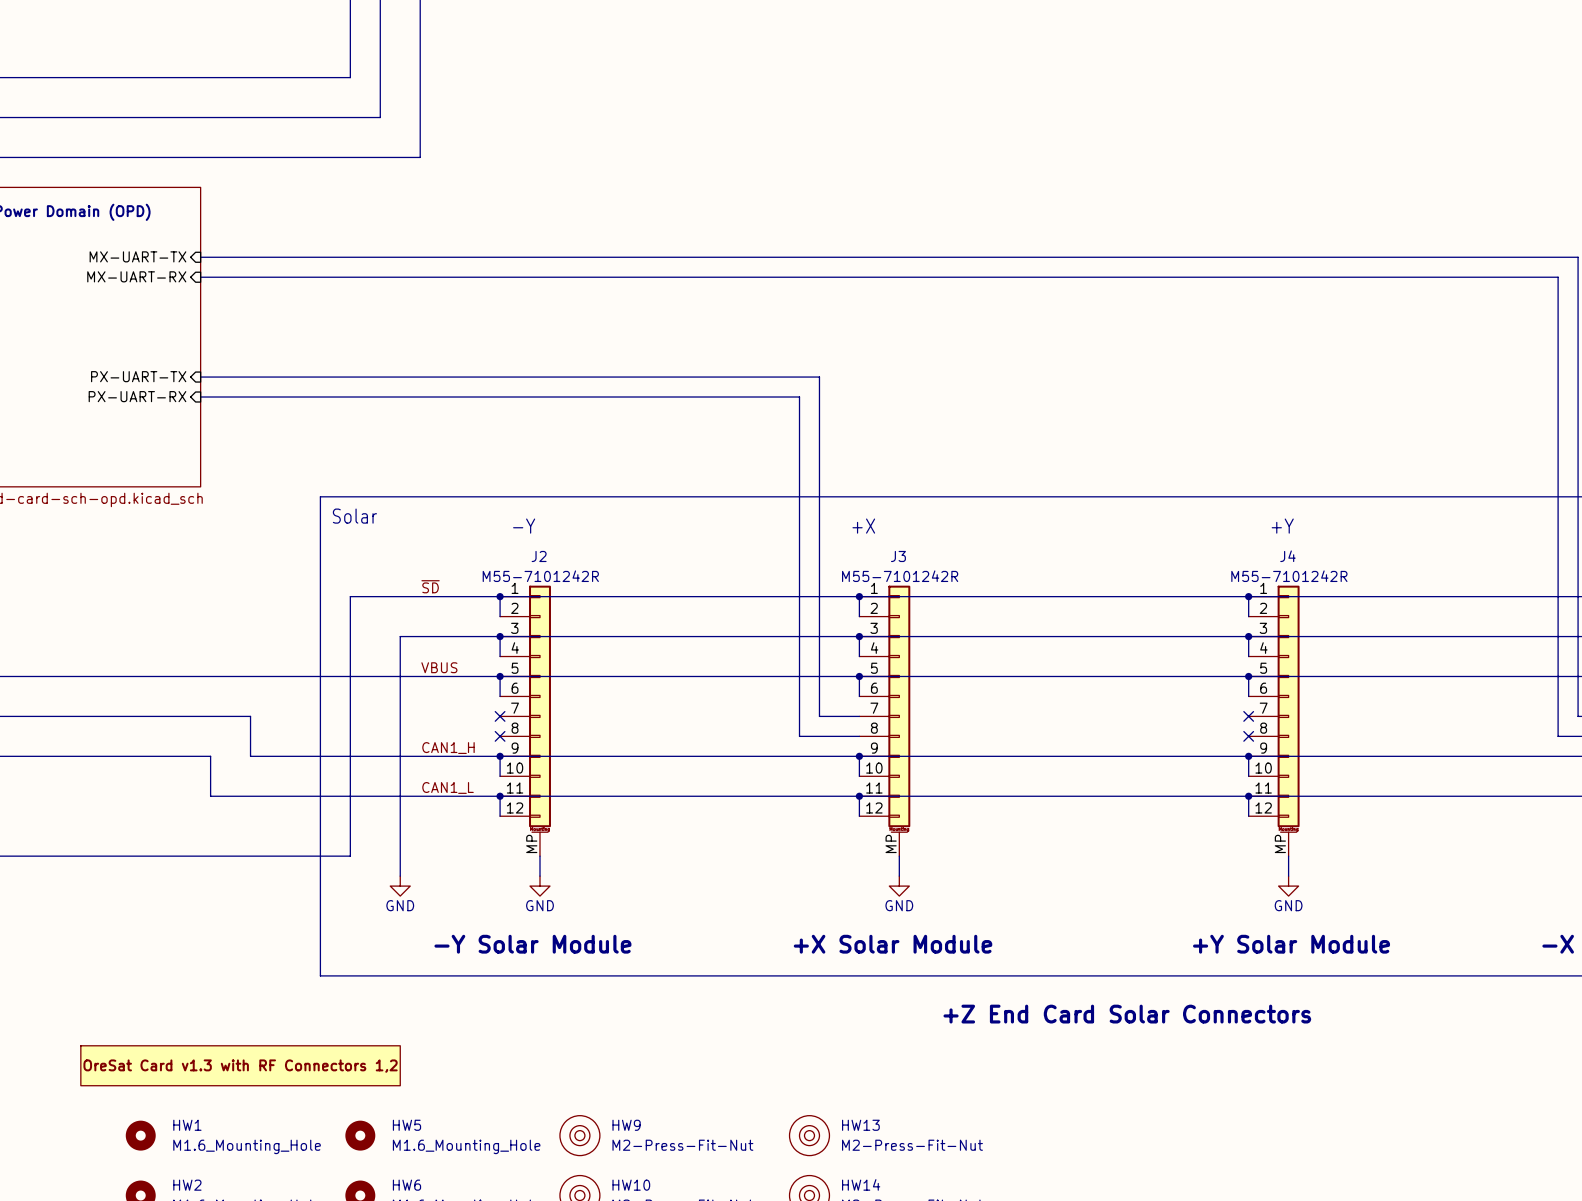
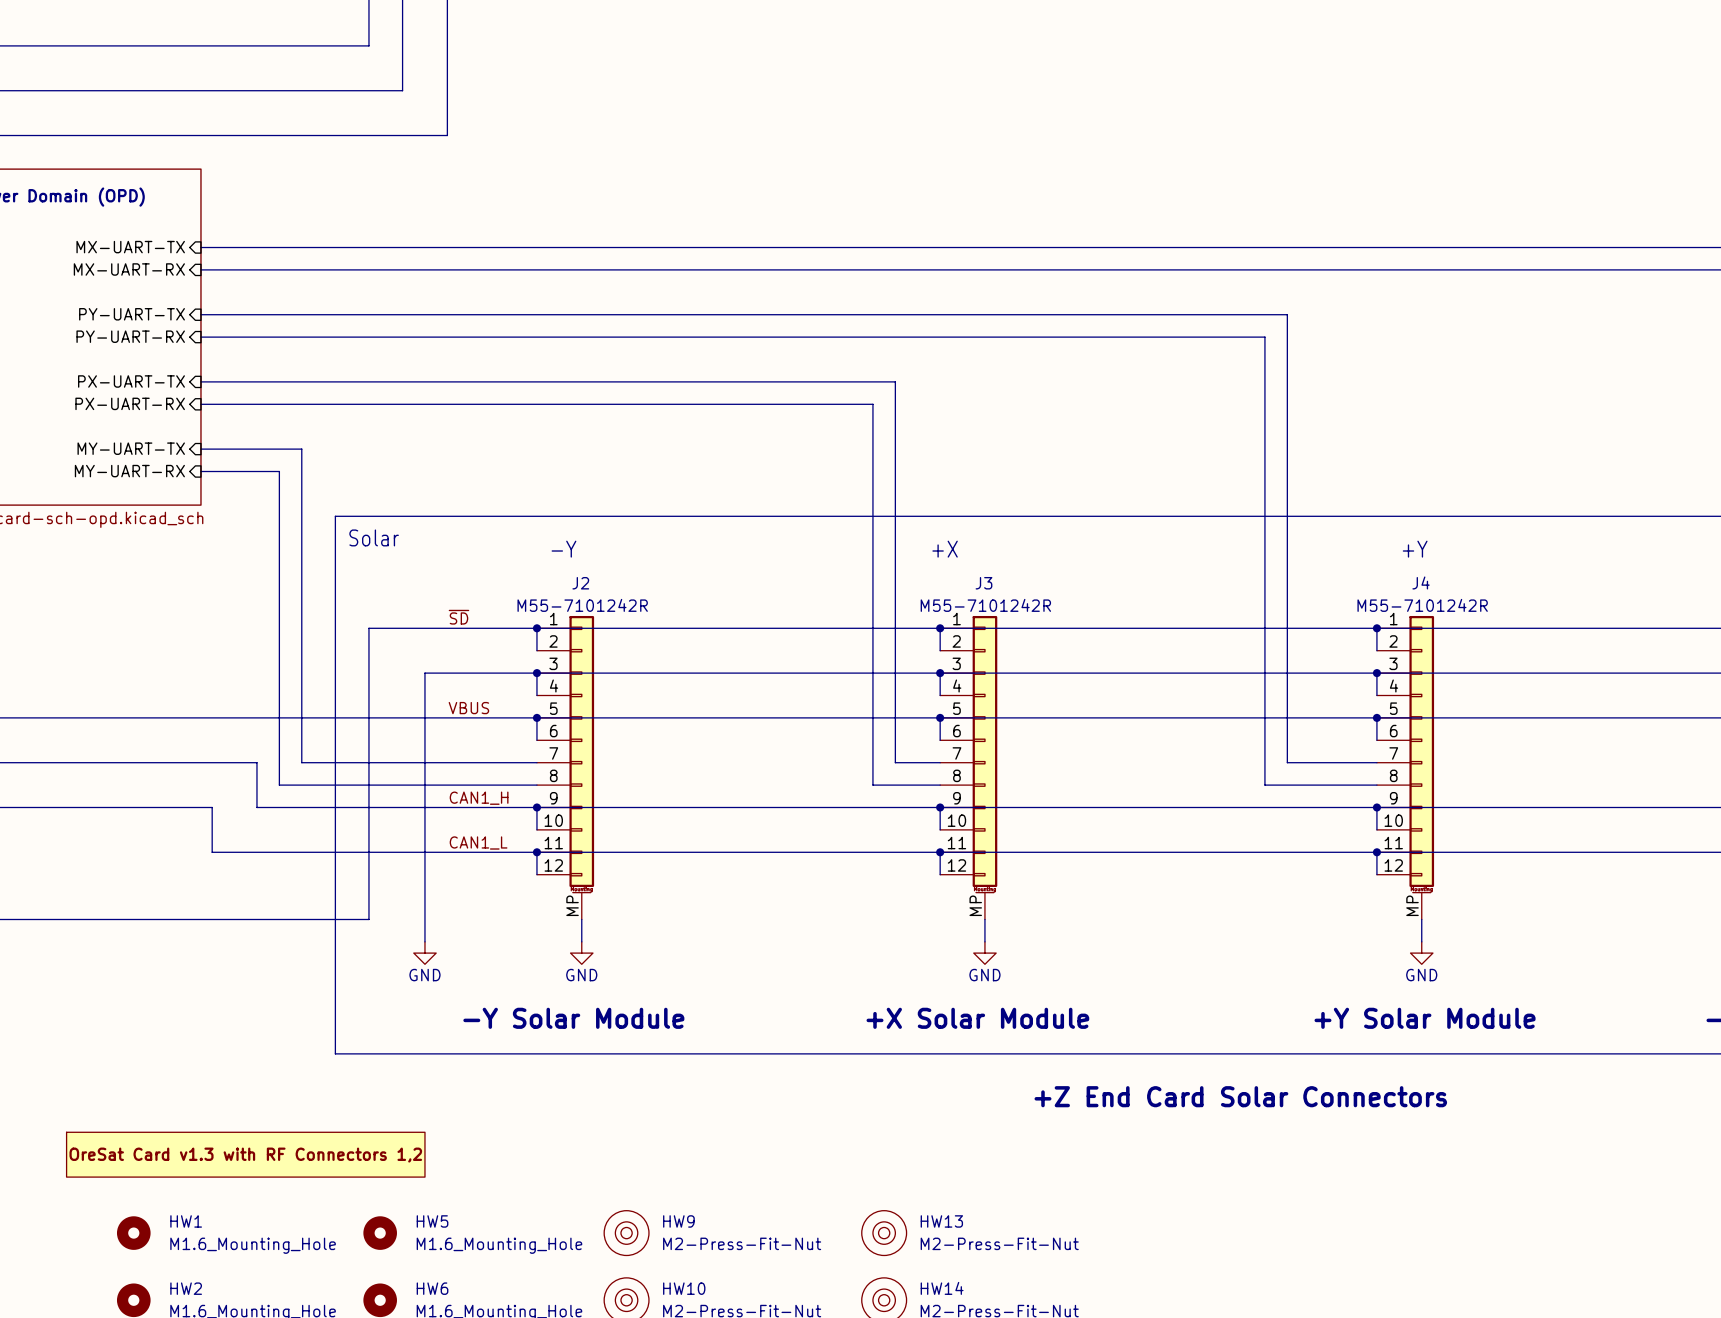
sheet pin: none -> PY-UART-TX (132, 314)
wire: none -> (200, 314) (1287, 314) (1287, 762) (1376, 762)
sheet pin: none -> PY-UART-RX (130, 336)
wire: none -> (200, 337) (1264, 337) (1264, 785) (1376, 785)
sheet pin: none -> MY-UART-TX (131, 448)
wire: none -> (200, 449) (301, 449) (301, 762) (536, 762)
sheet pin: none -> MY-UART-RX (129, 471)
wire: none -> (200, 471) (279, 471) (279, 785) (536, 785)
no-connect mark: (500, 716) -> none
no-connect mark: (1248, 716) -> none
no-connect mark: (500, 736) -> none
no-connect mark: (1248, 736) -> none

